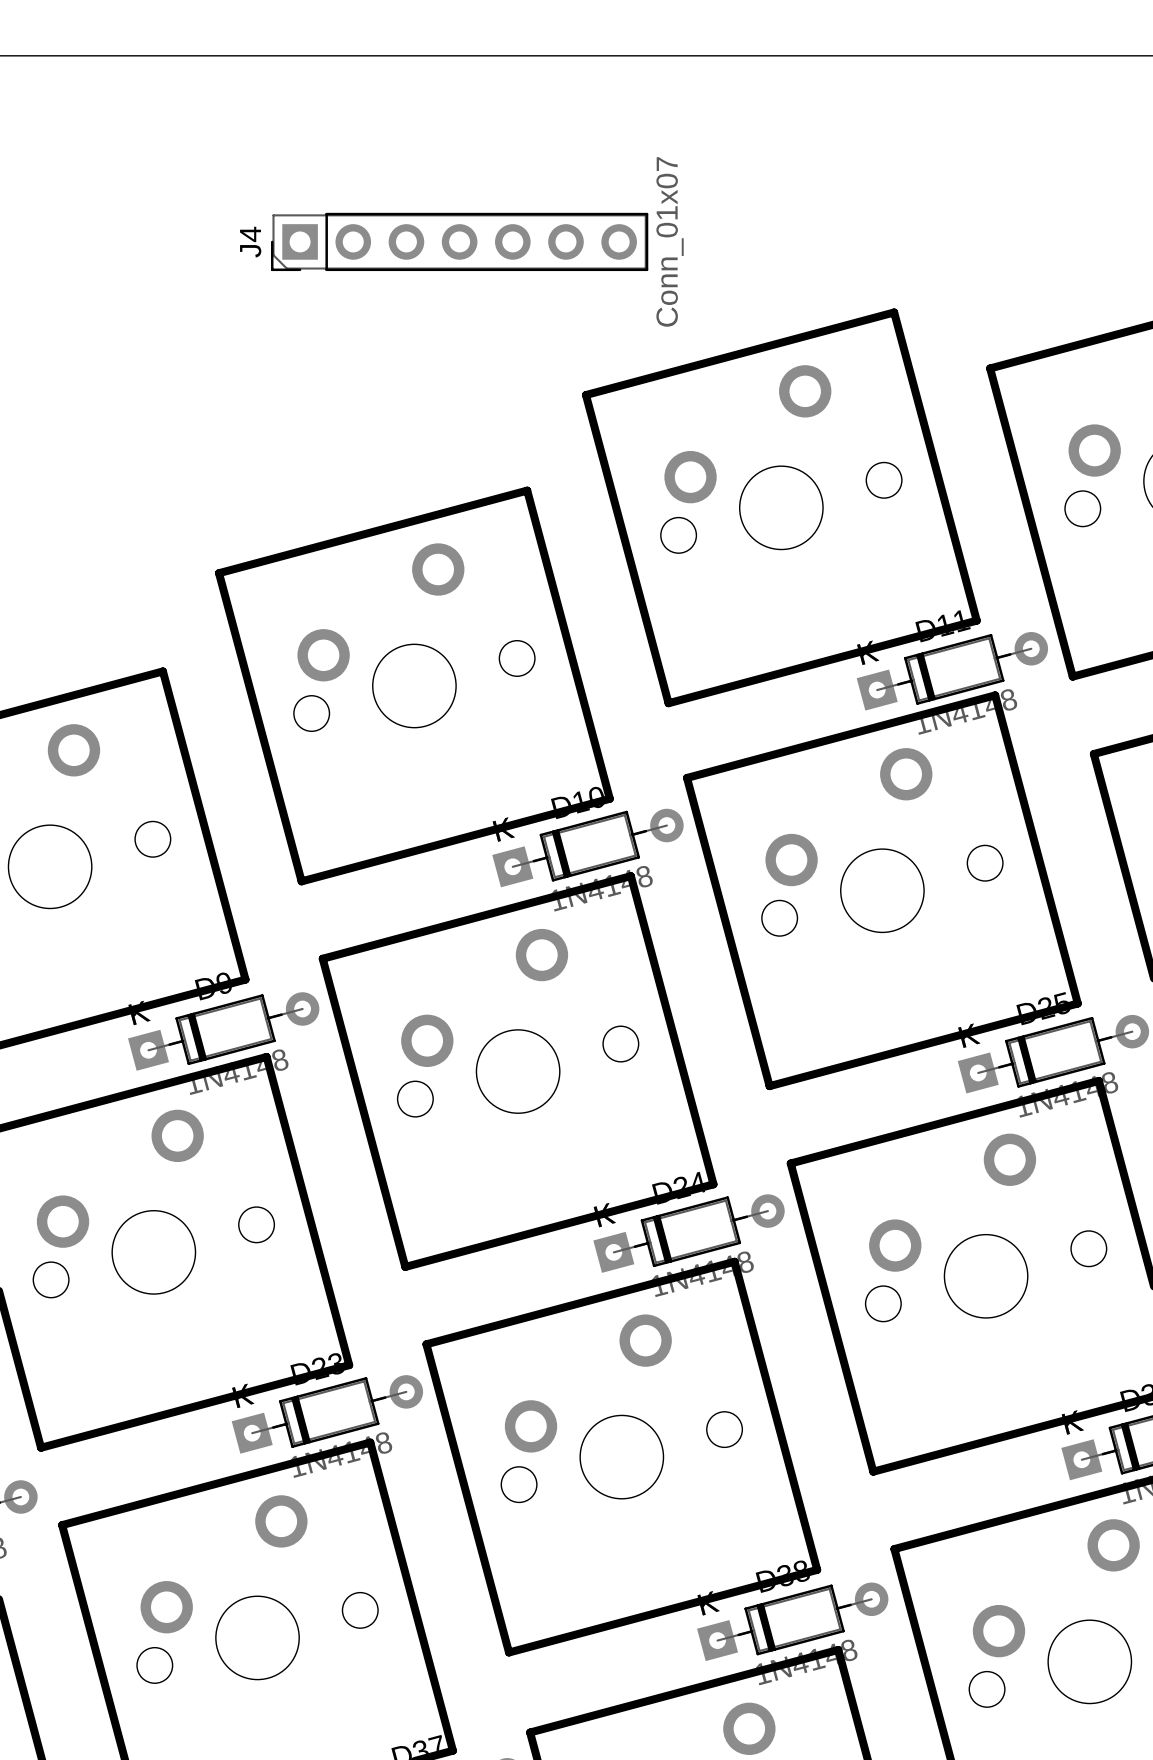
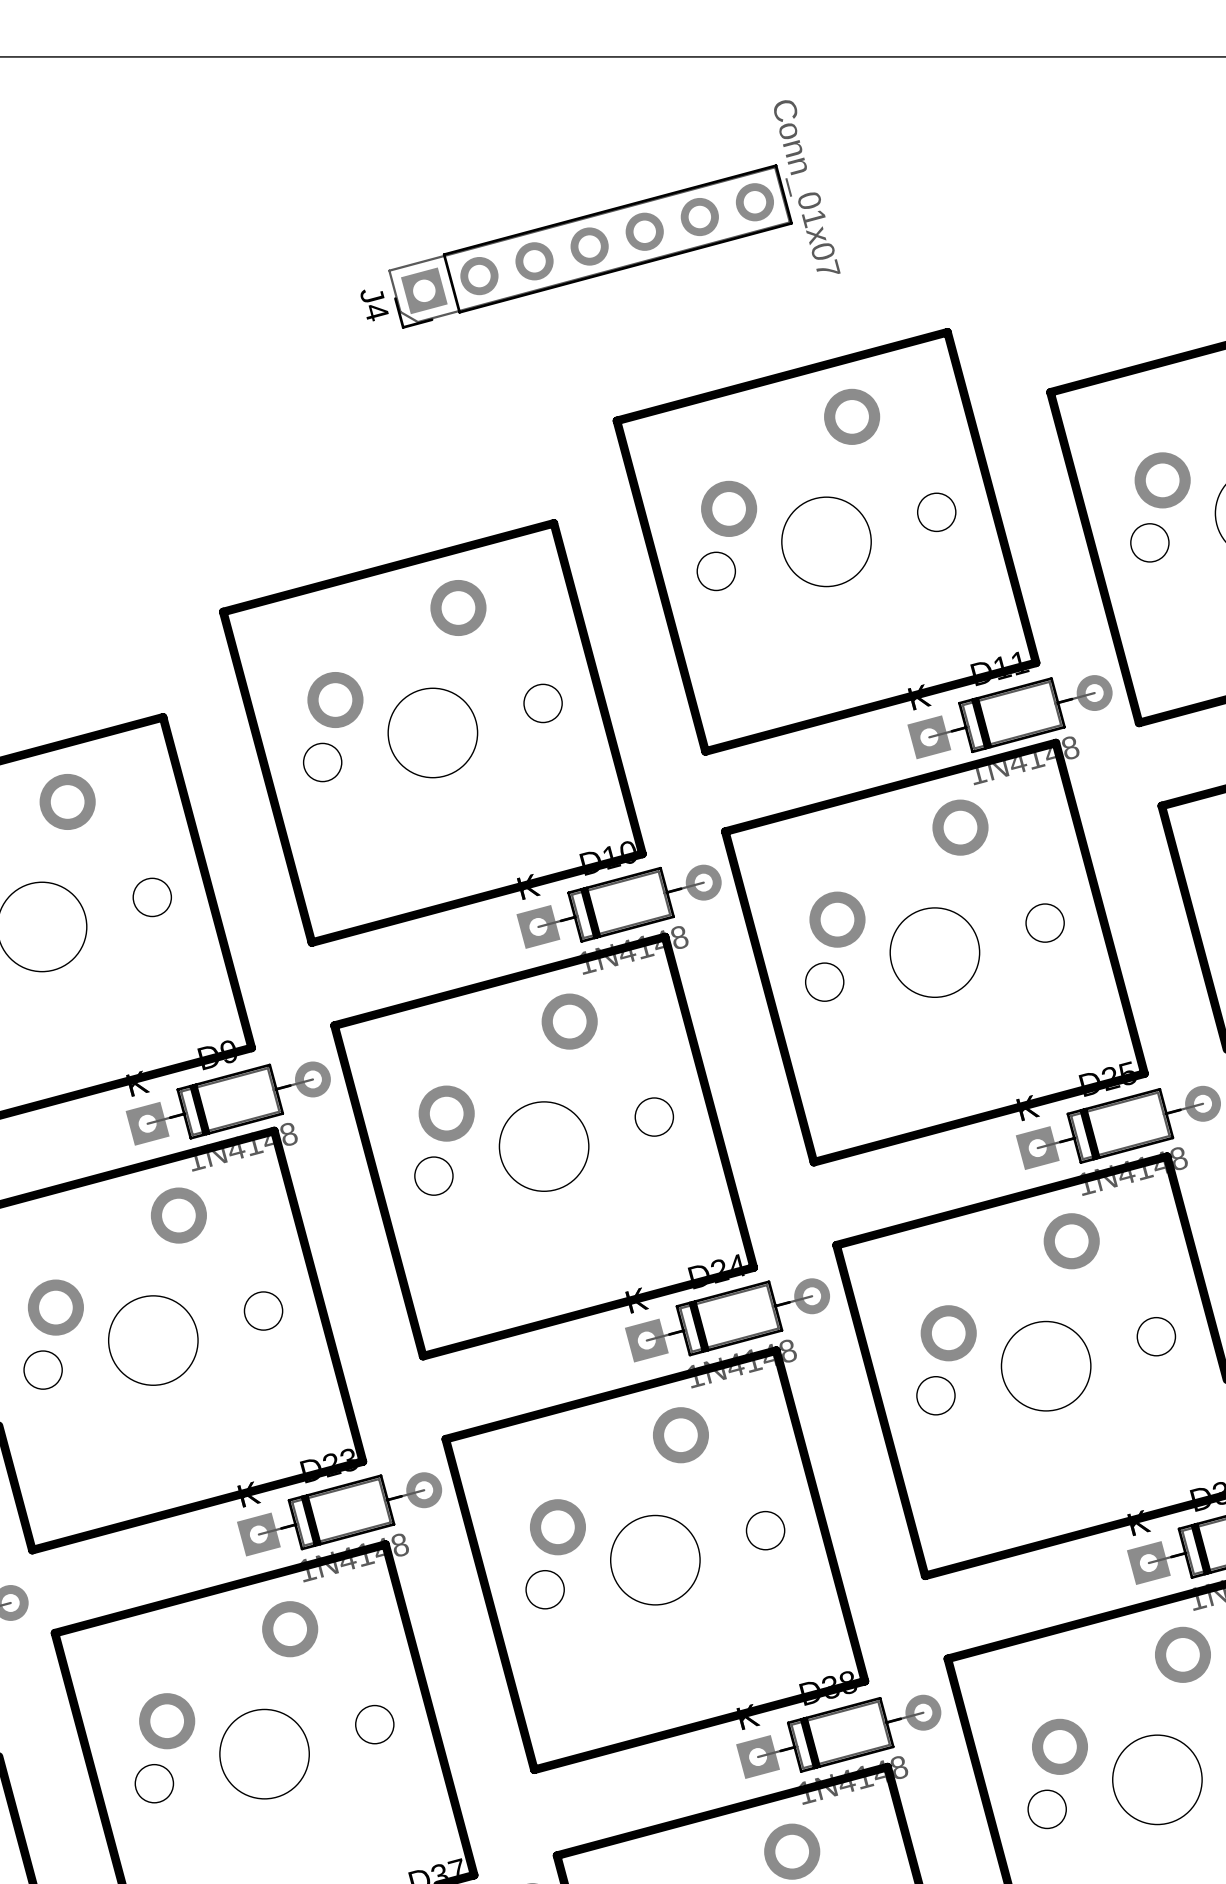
J4 rotation: 0° (459, 241) -> 15° counterclockwise (590, 246)

